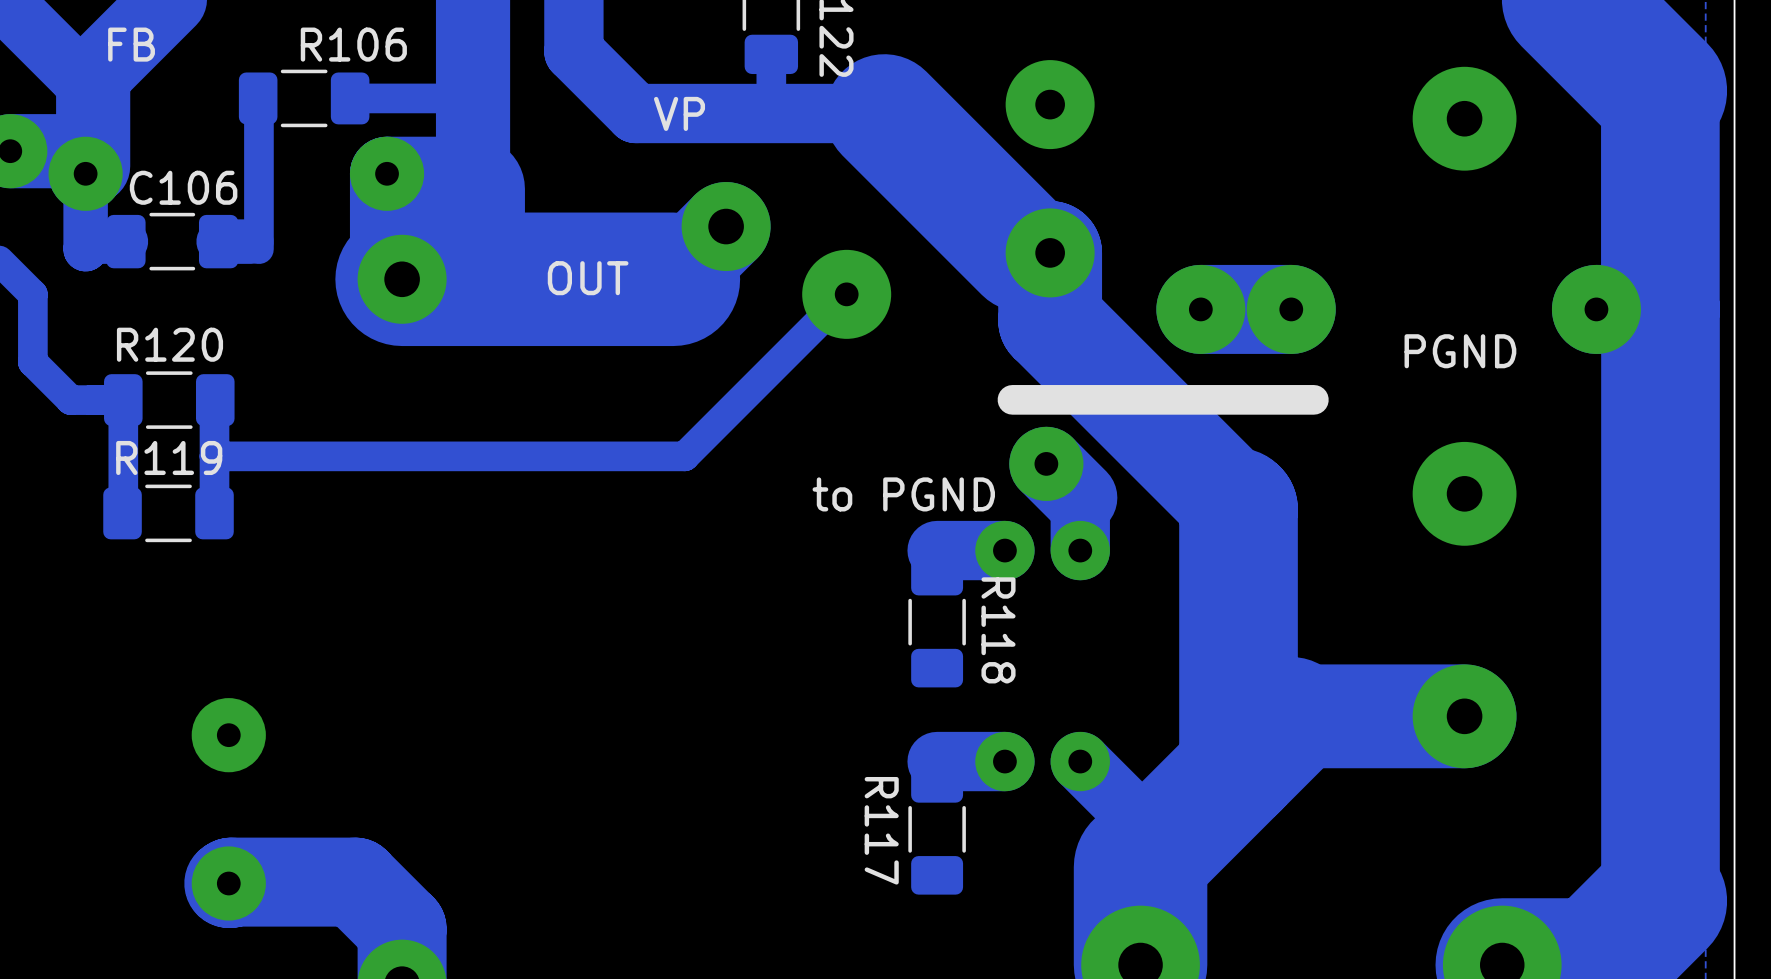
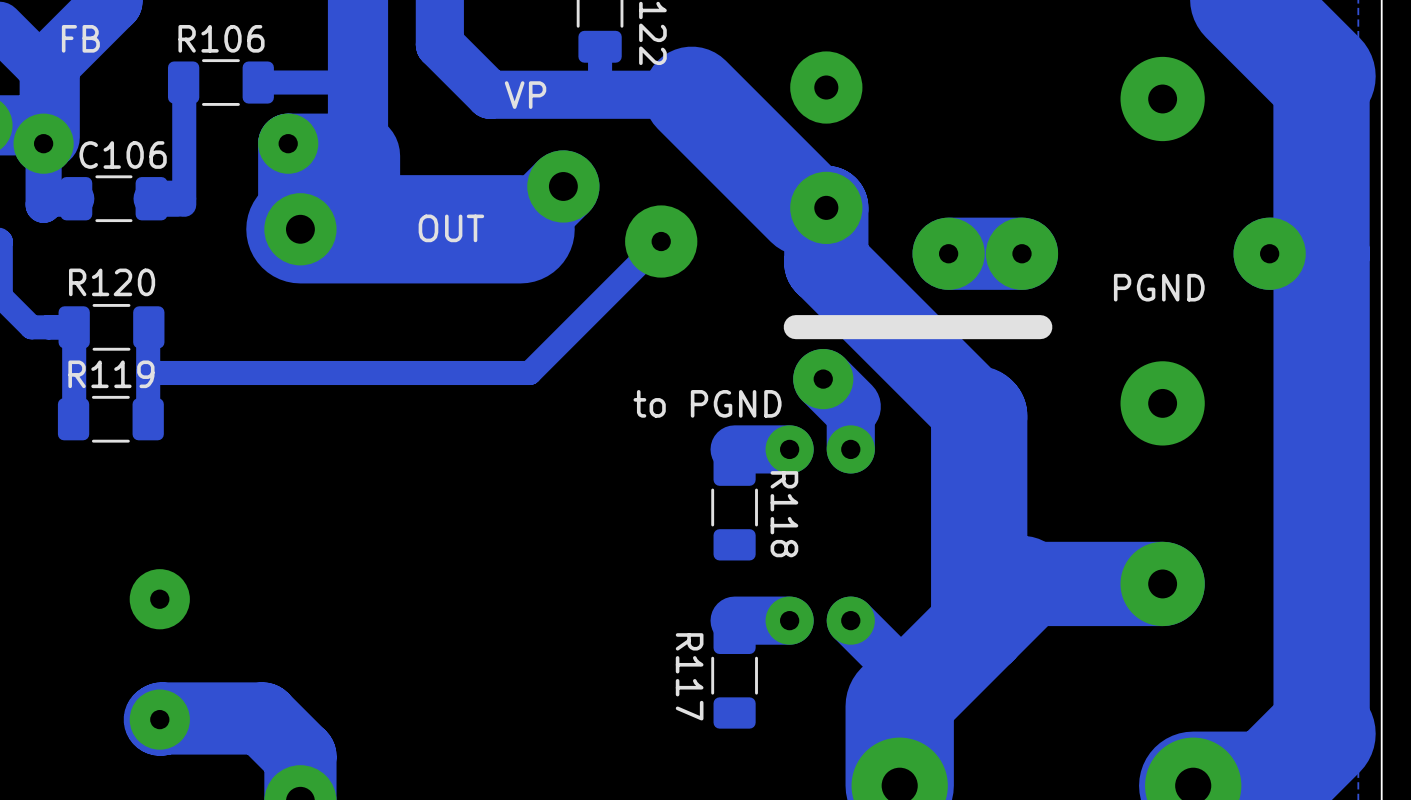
R106 name position: R106 (353, 44) -> R106 (221, 38)

